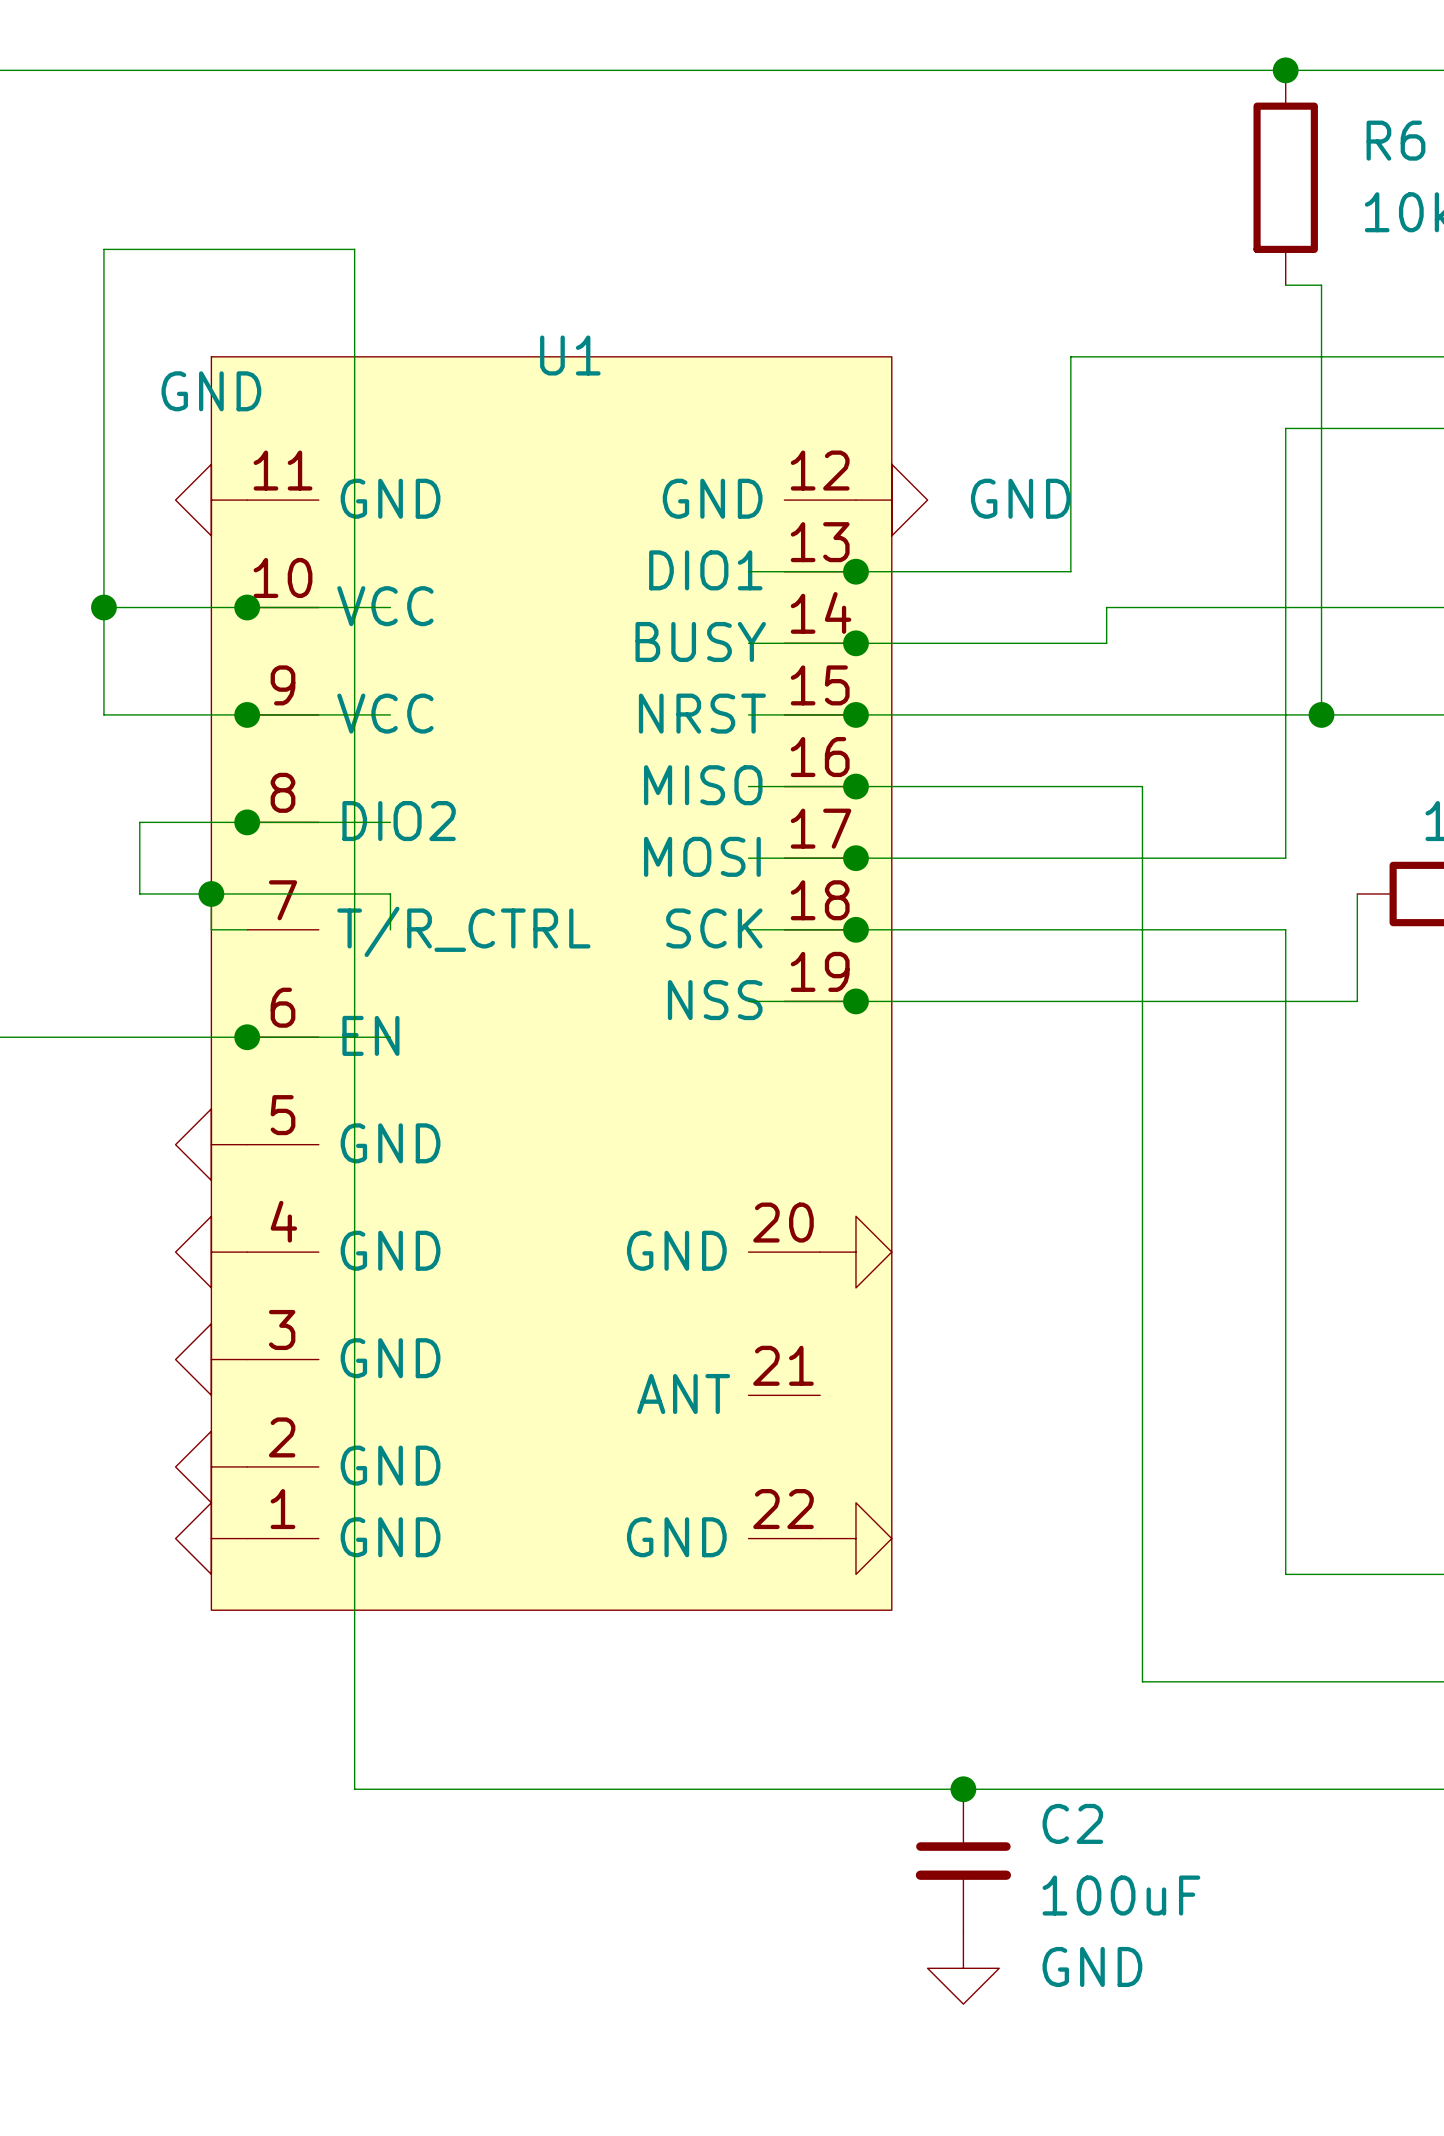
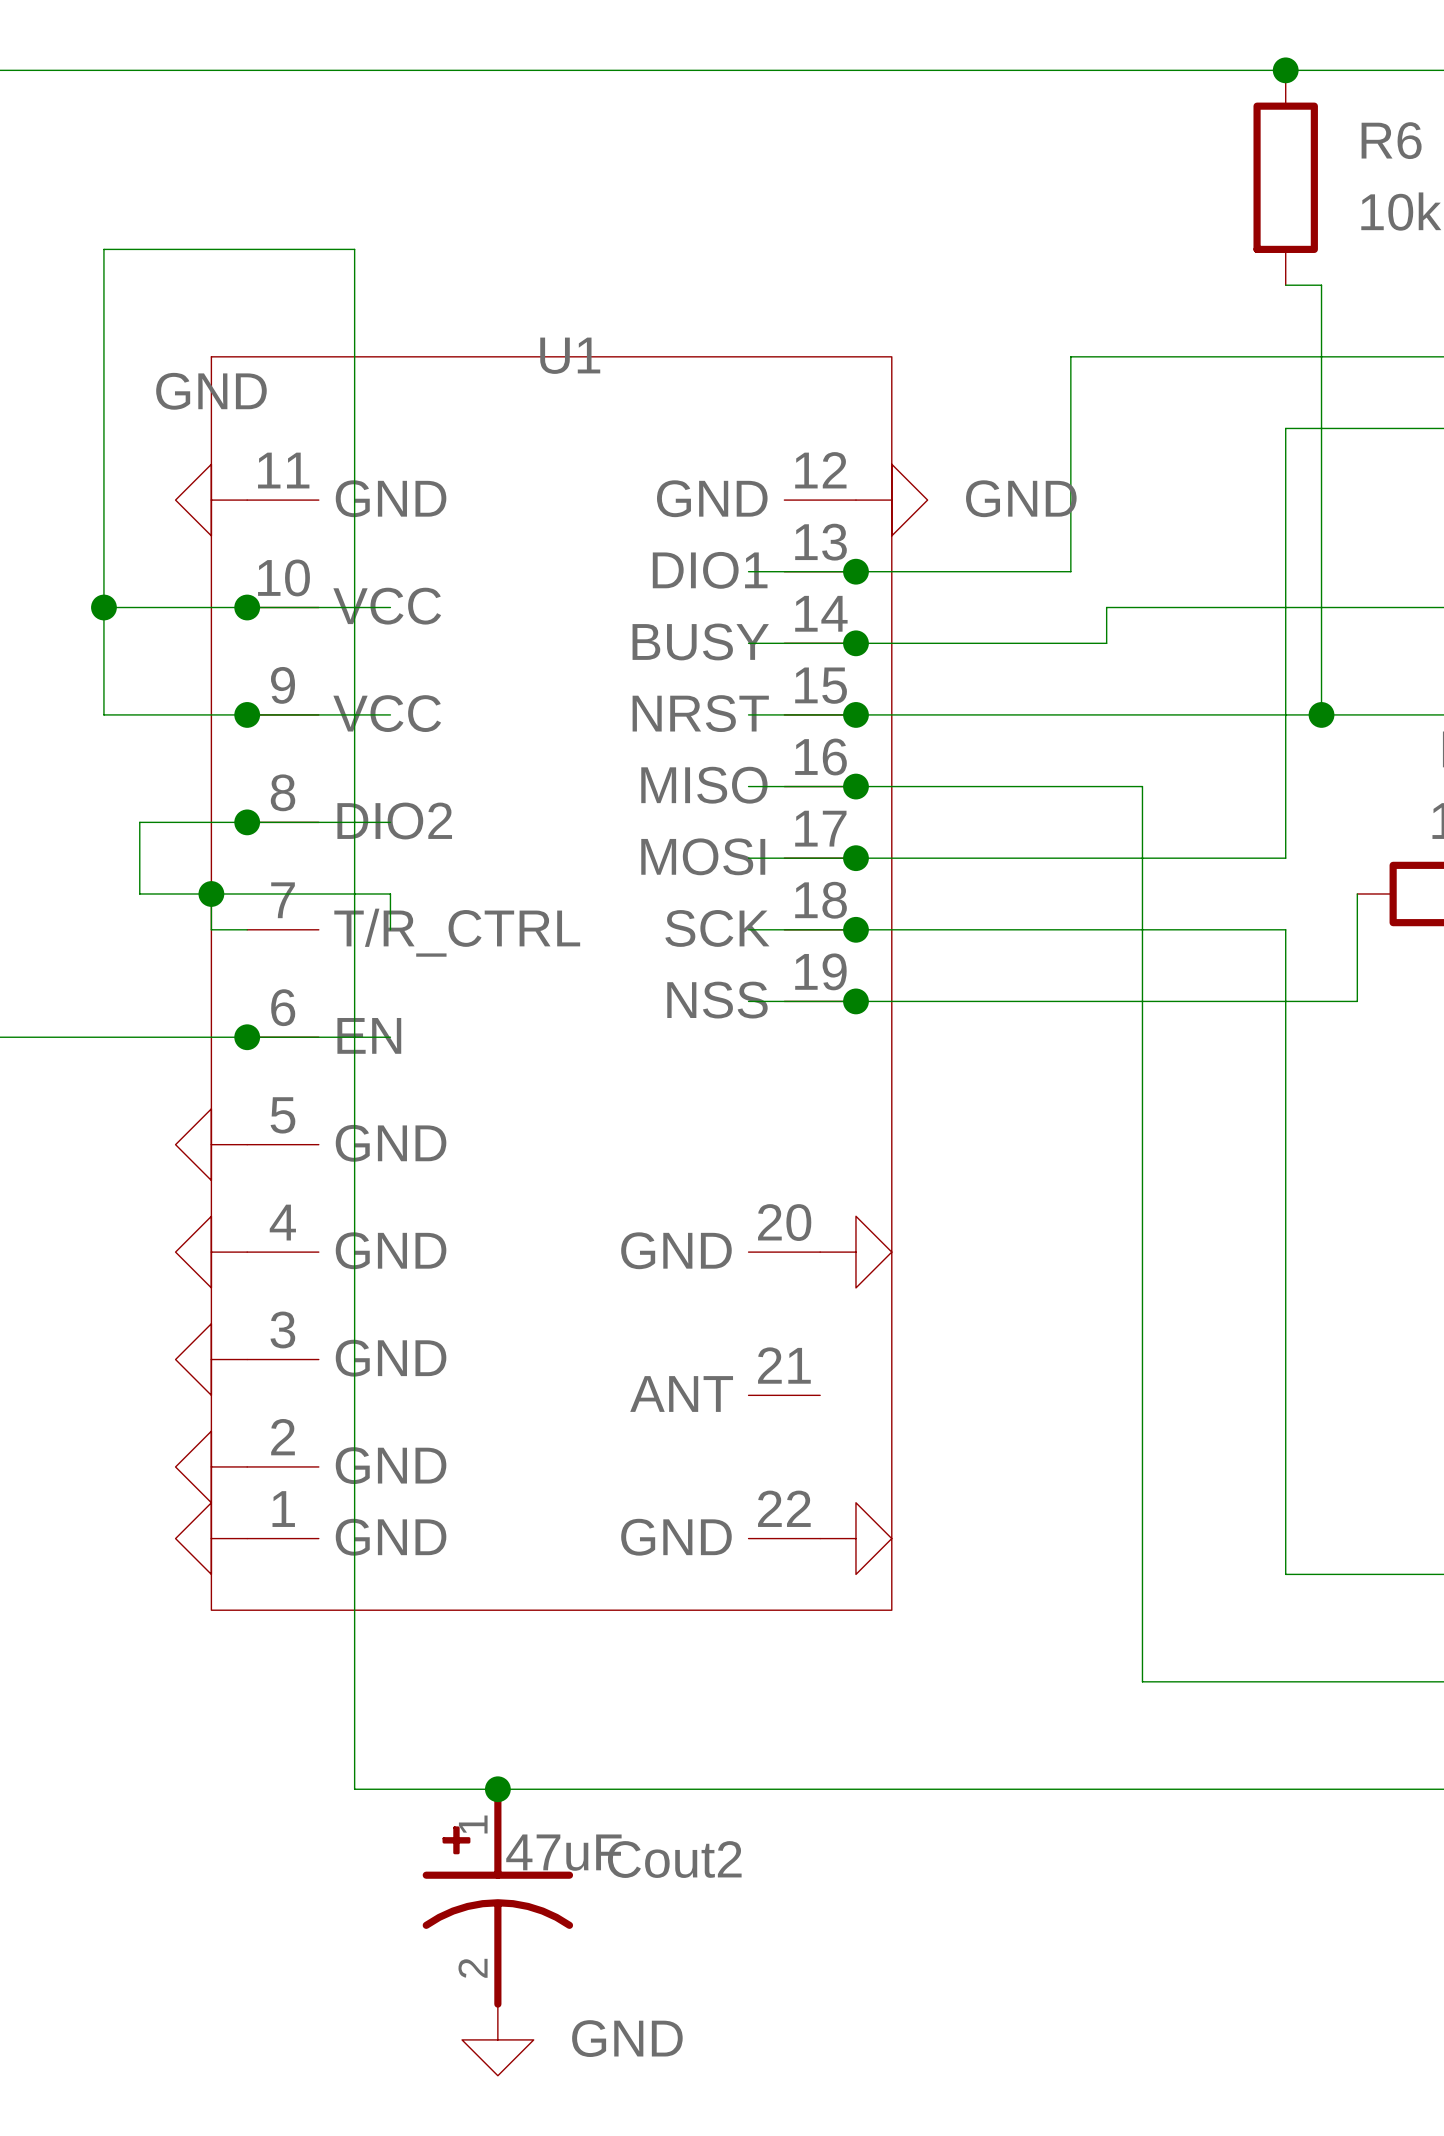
junction: none -> (497, 1789)
junction: (963, 1789) -> none
C2: 100uF (963, 1860) -> none
Cout2: none -> 47uF (497, 1896)
power symbol position: GND (963, 1968) -> GND (497, 2039)

